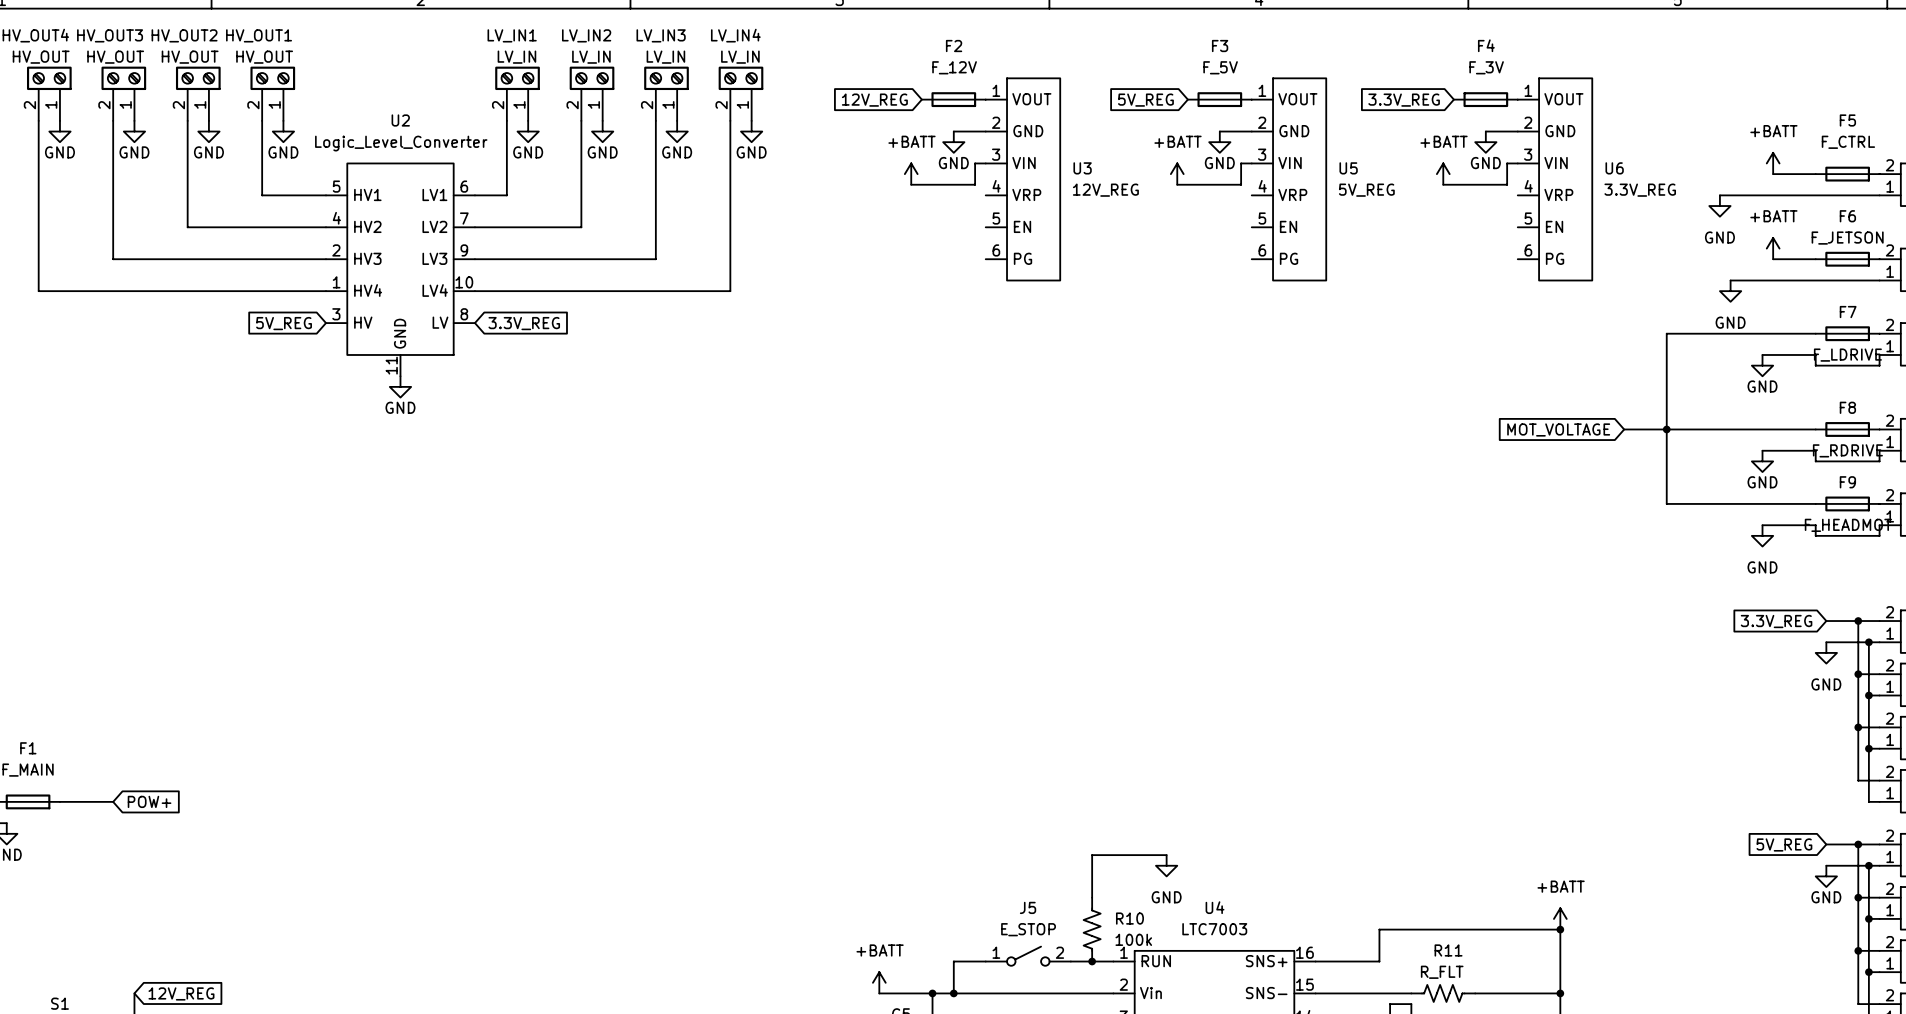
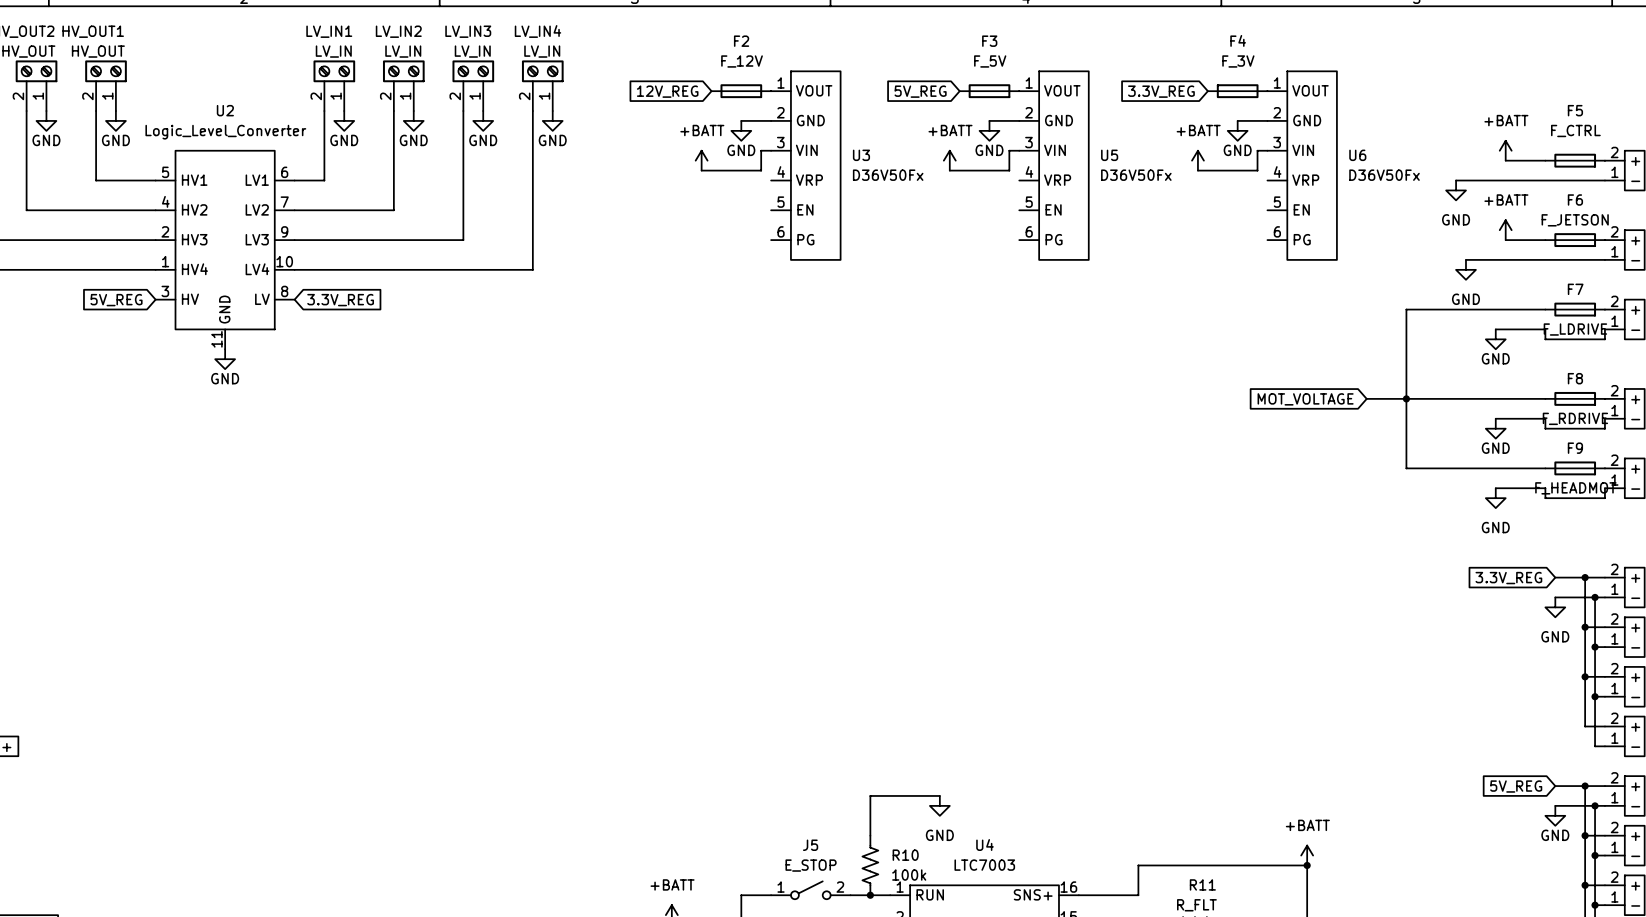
U3 value: 12V_REG (1105, 190) -> D36V50Fx (888, 175)
U5 value: 5V_REG (1366, 190) -> D36V50Fx (1136, 175)
U6 value: 3.3V_REG (1640, 190) -> D36V50Fx (1384, 175)

